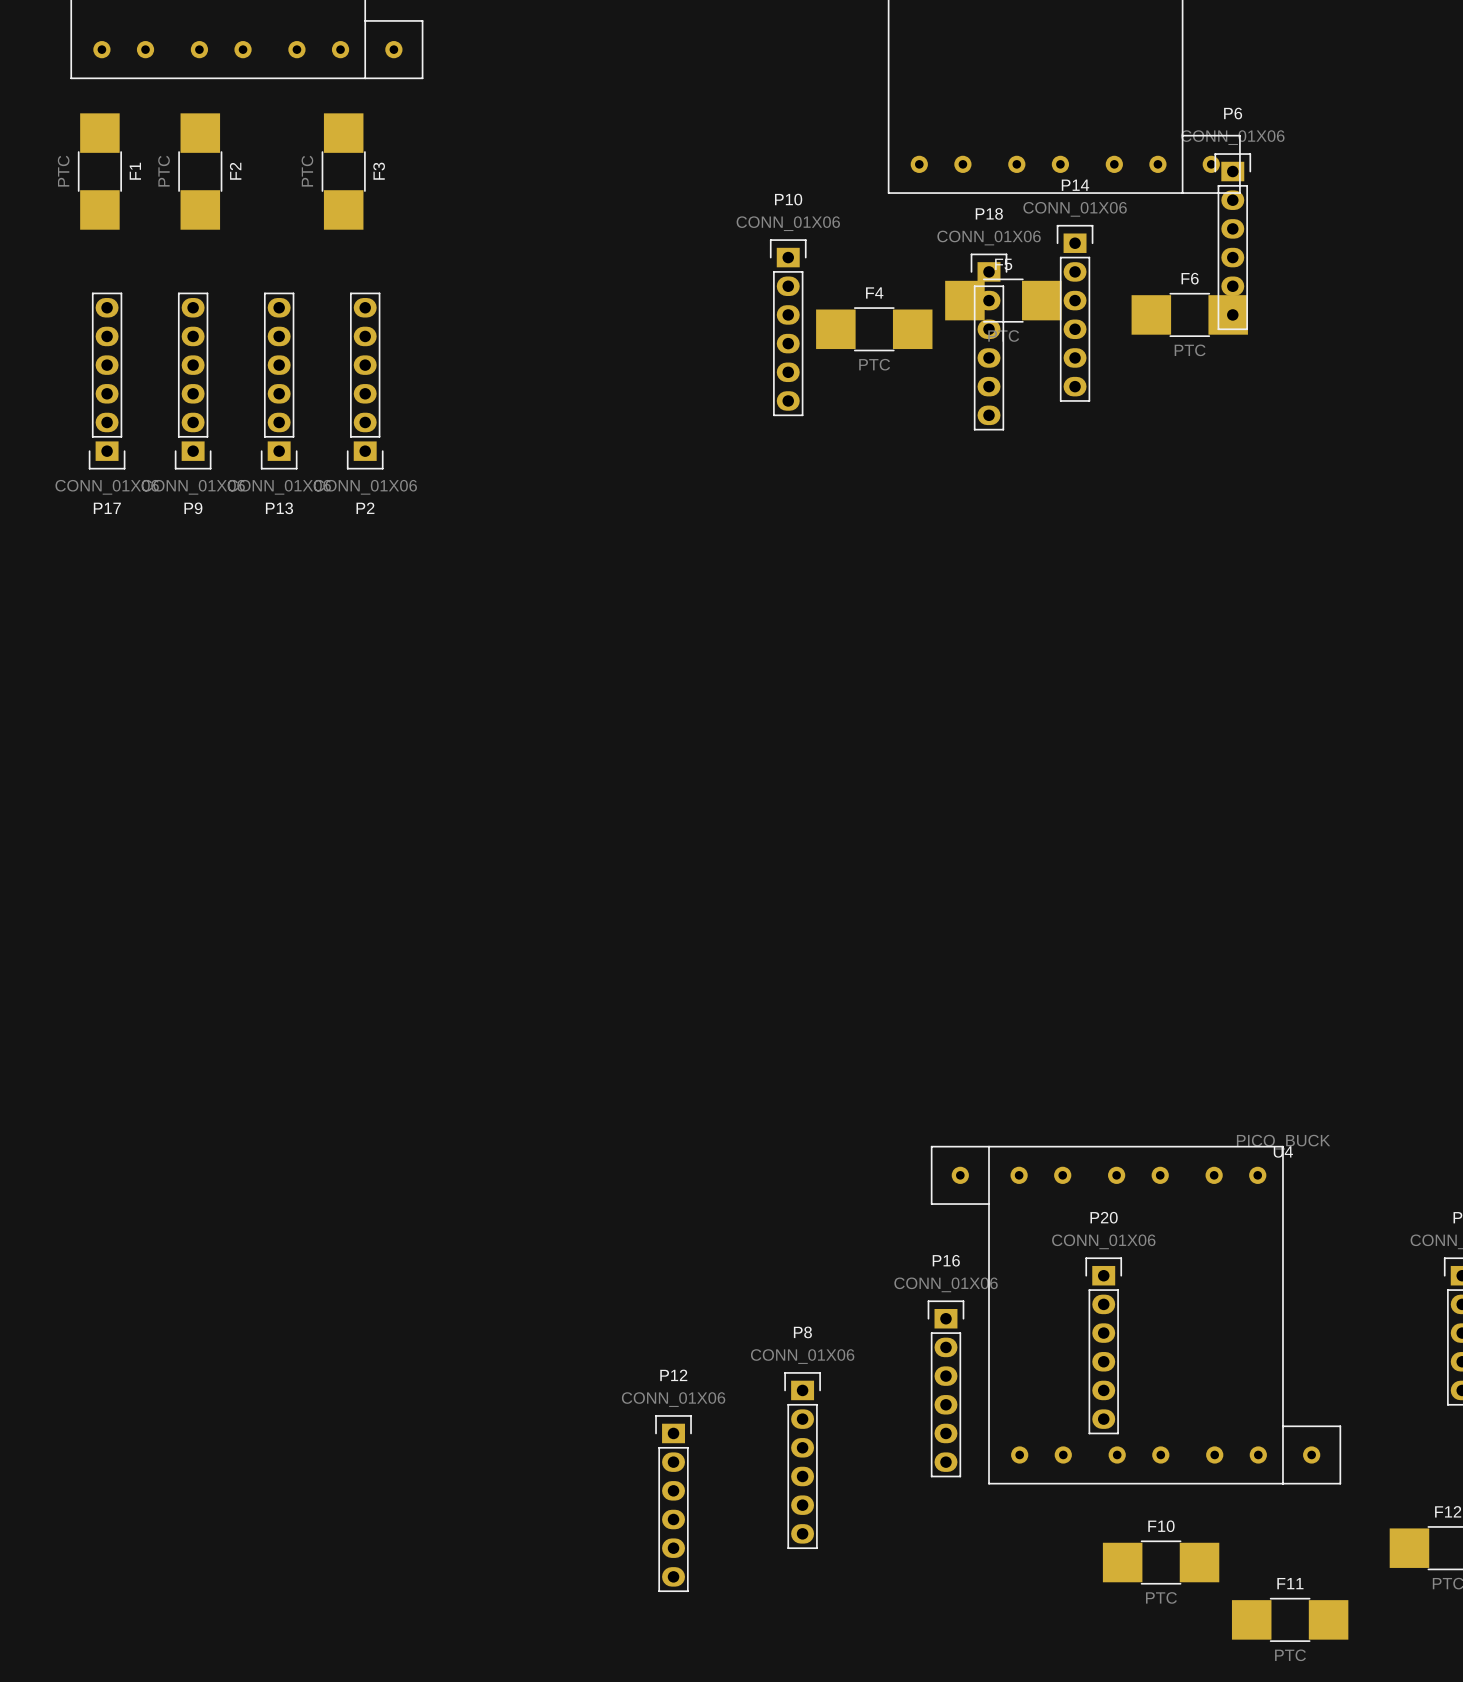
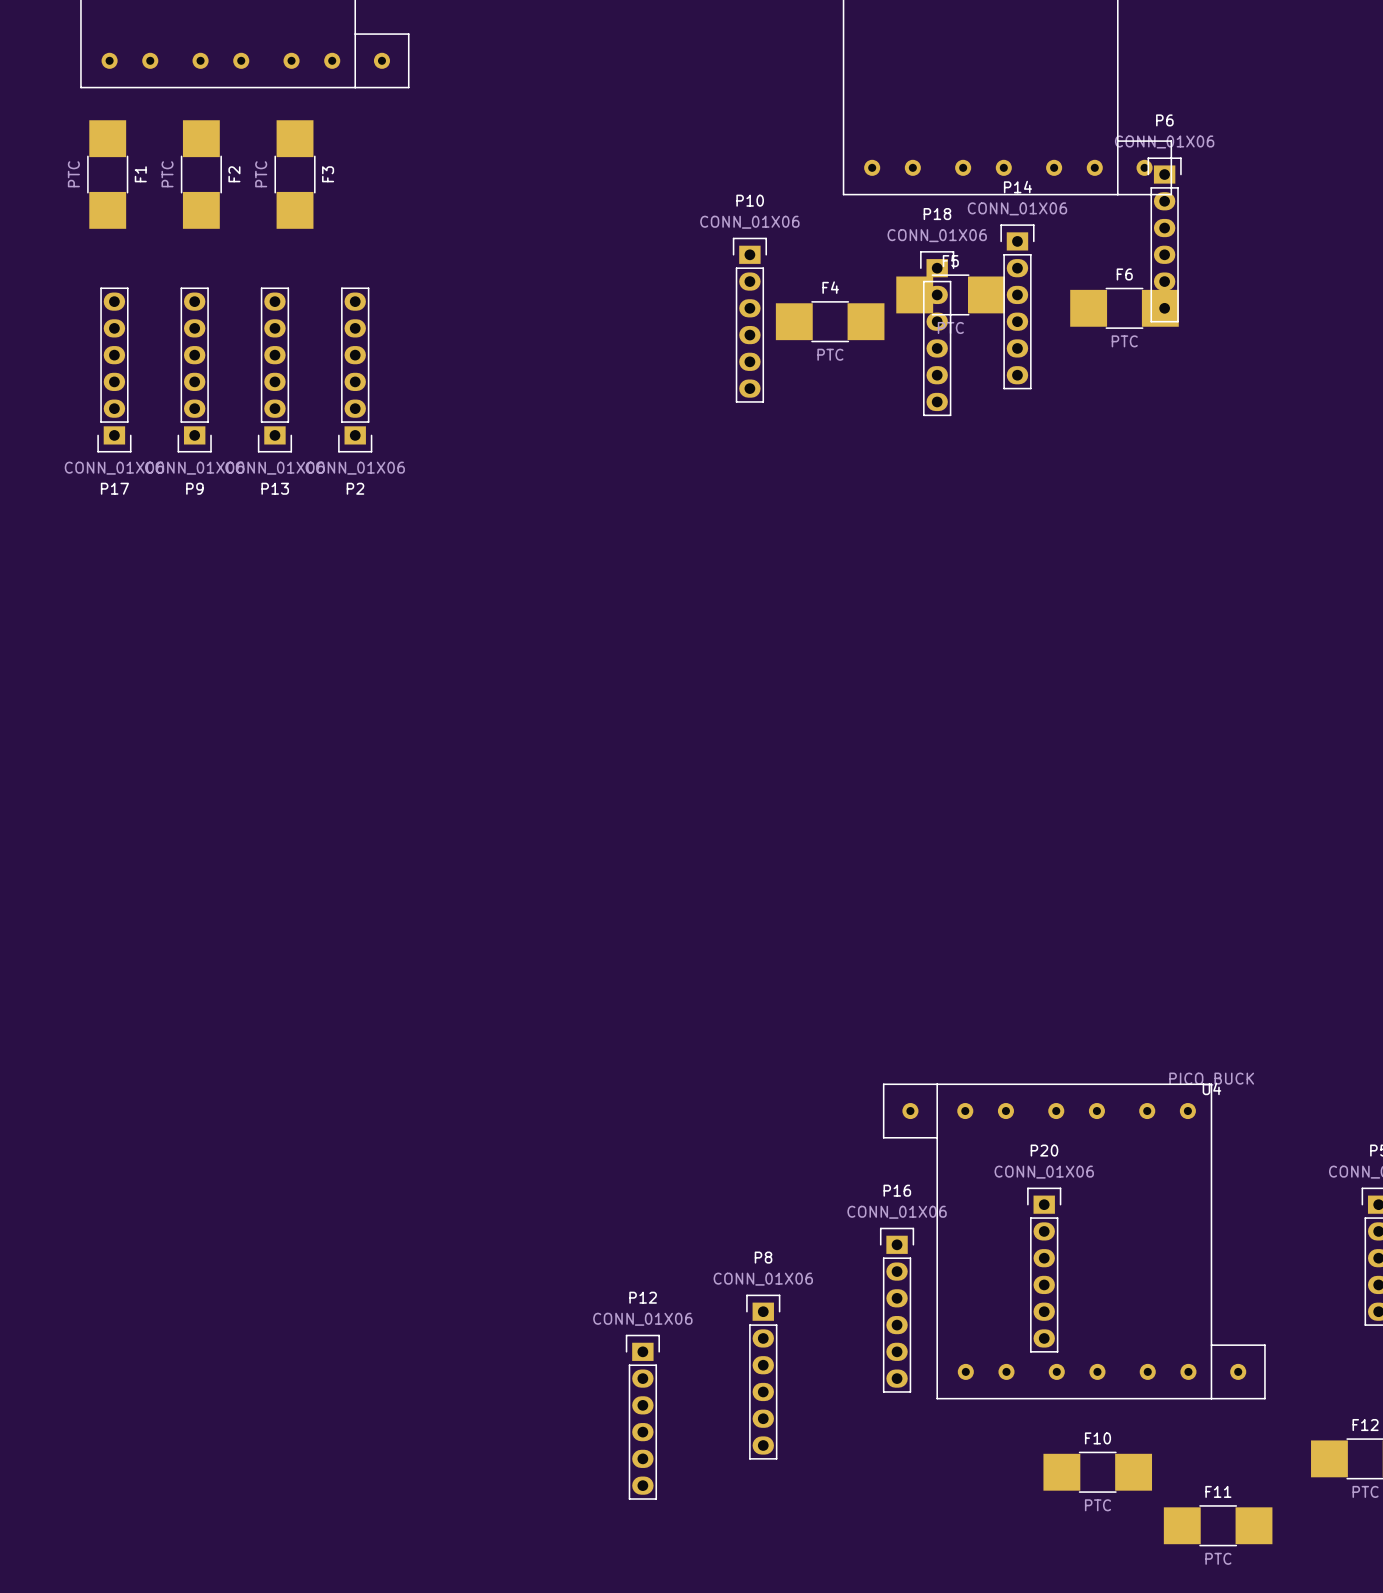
F3 position: (343, 171) -> (295, 174)

